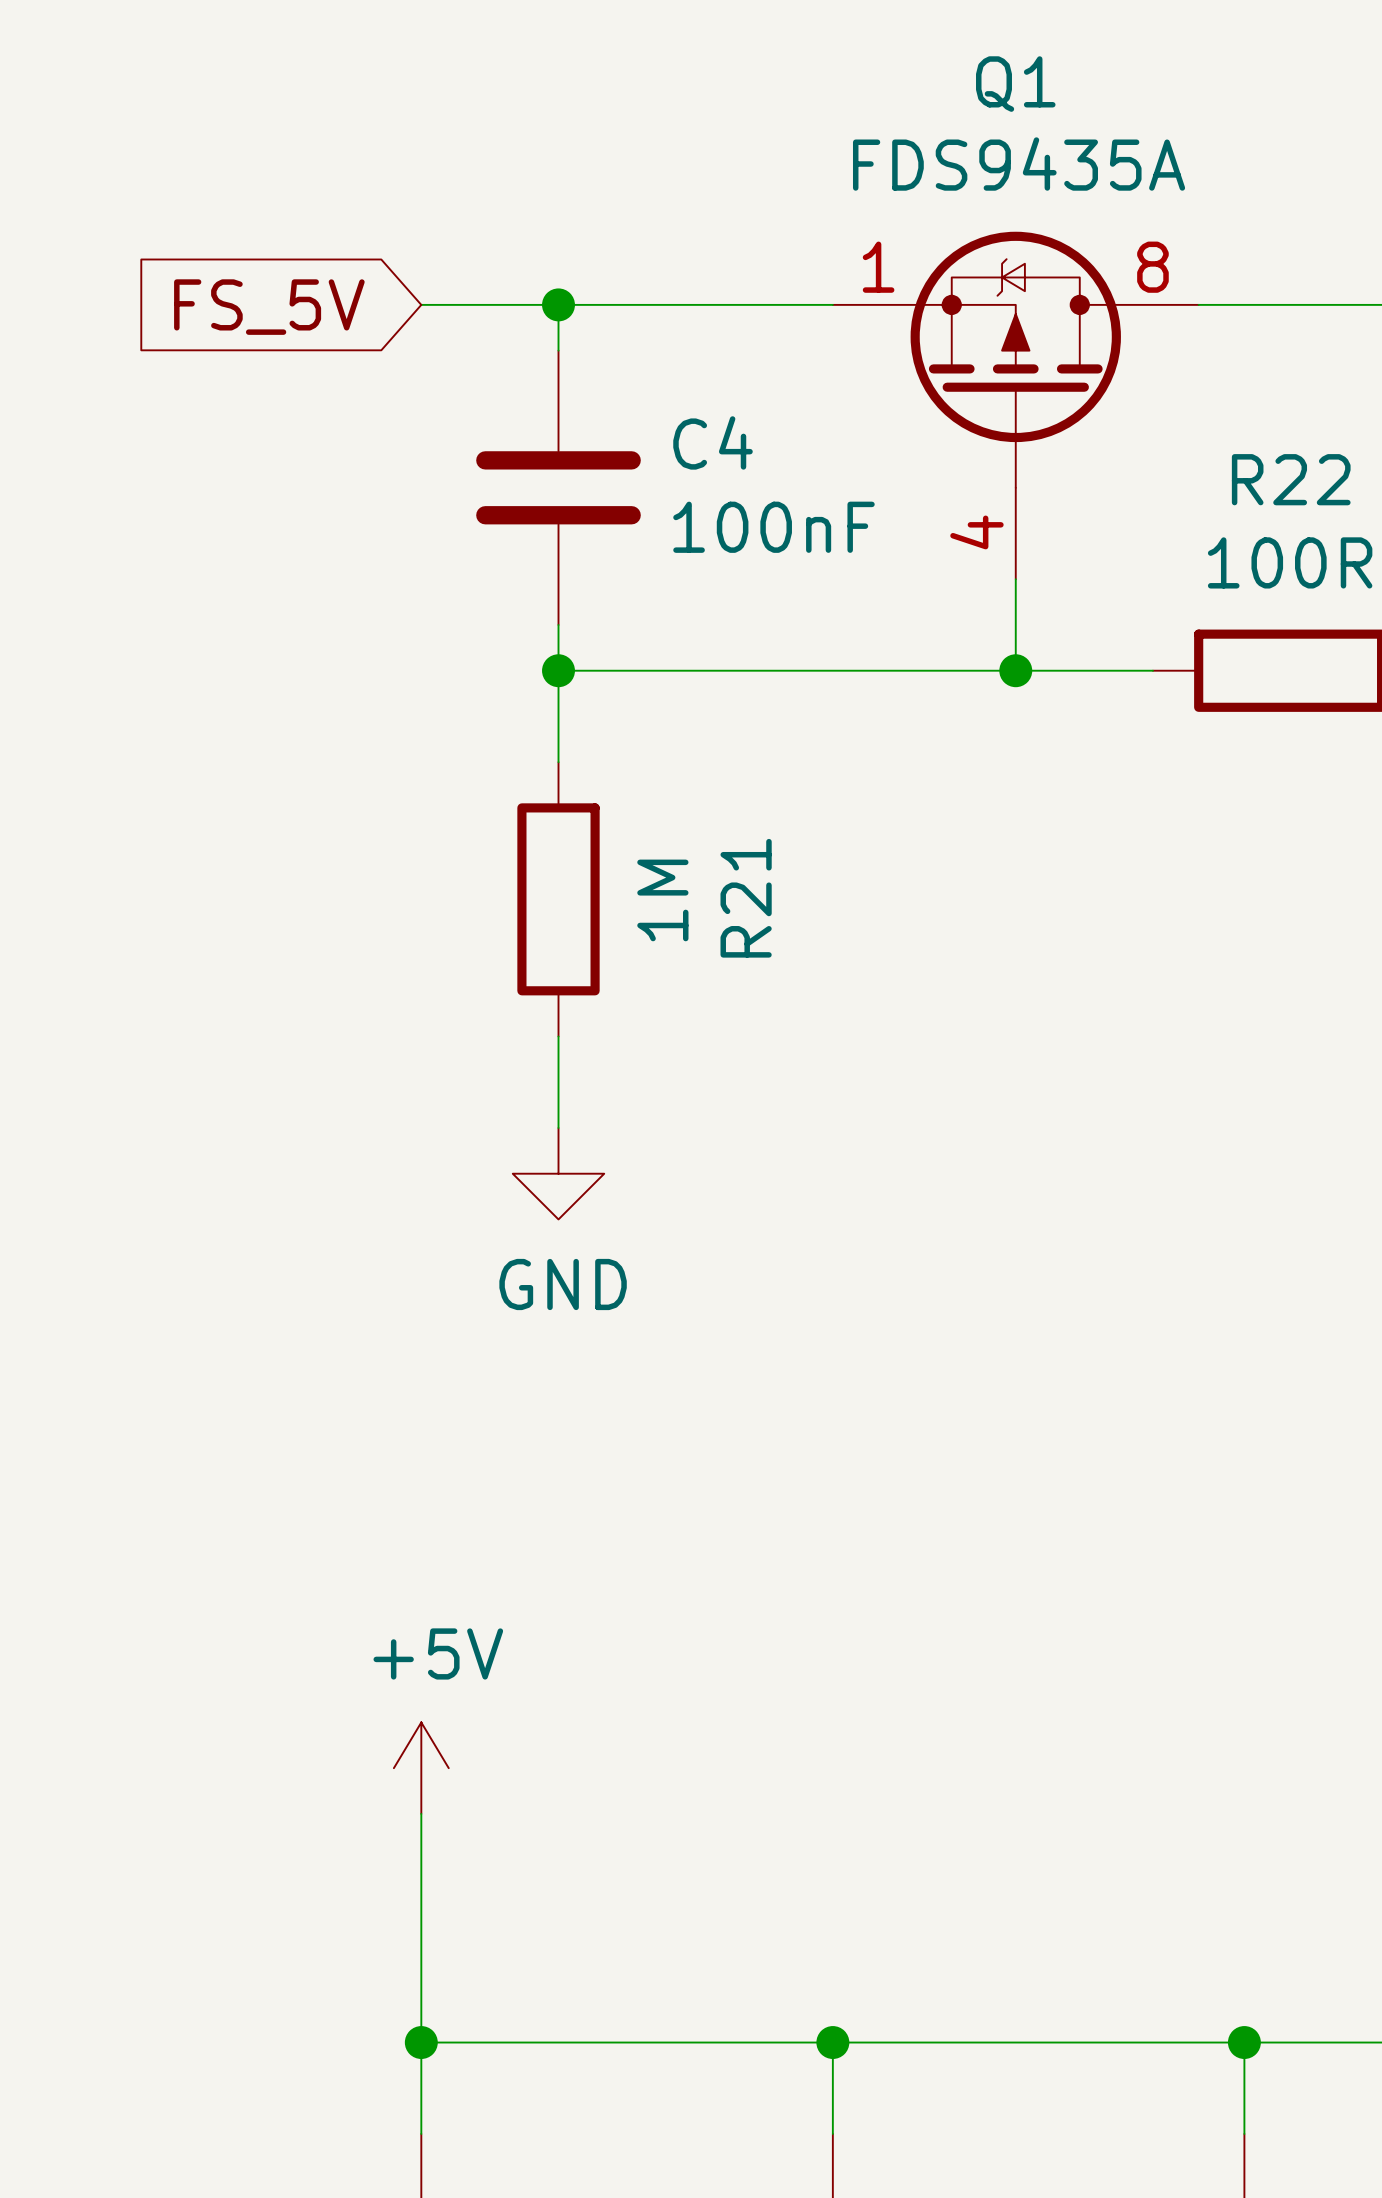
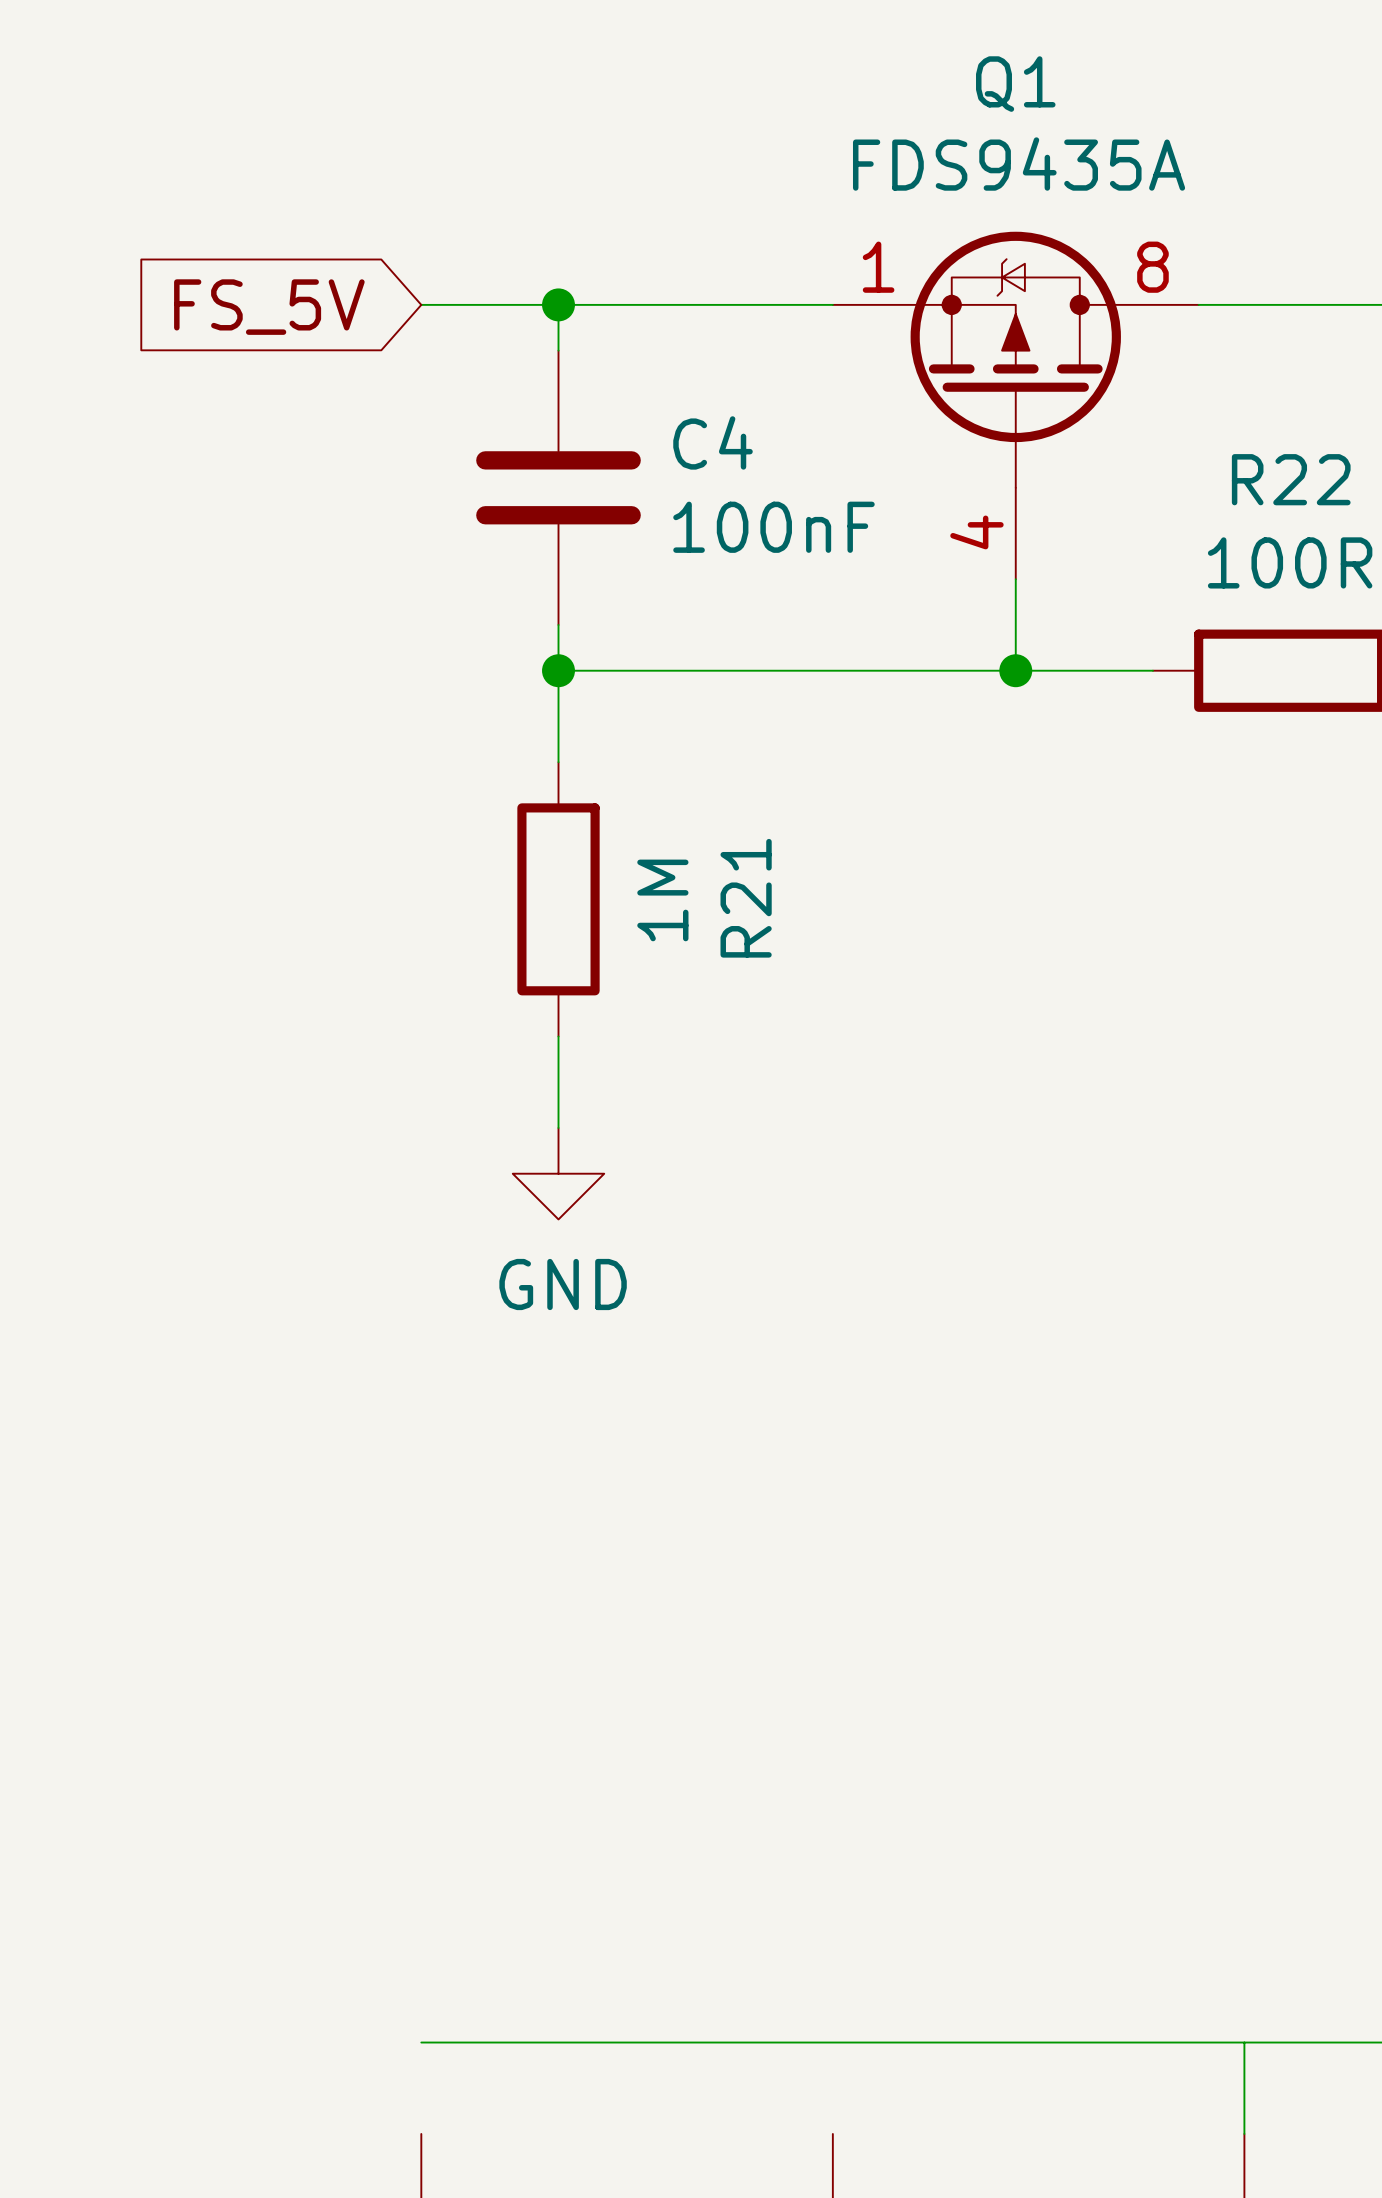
power symbol: +5V (421, 1768) -> none
wire: (421, 1813) (421, 2133) -> none
junction: (421, 2042) -> none
wire: (832, 2042) (832, 2133) -> none
junction: (832, 2042) -> none
junction: (1244, 2042) -> none

